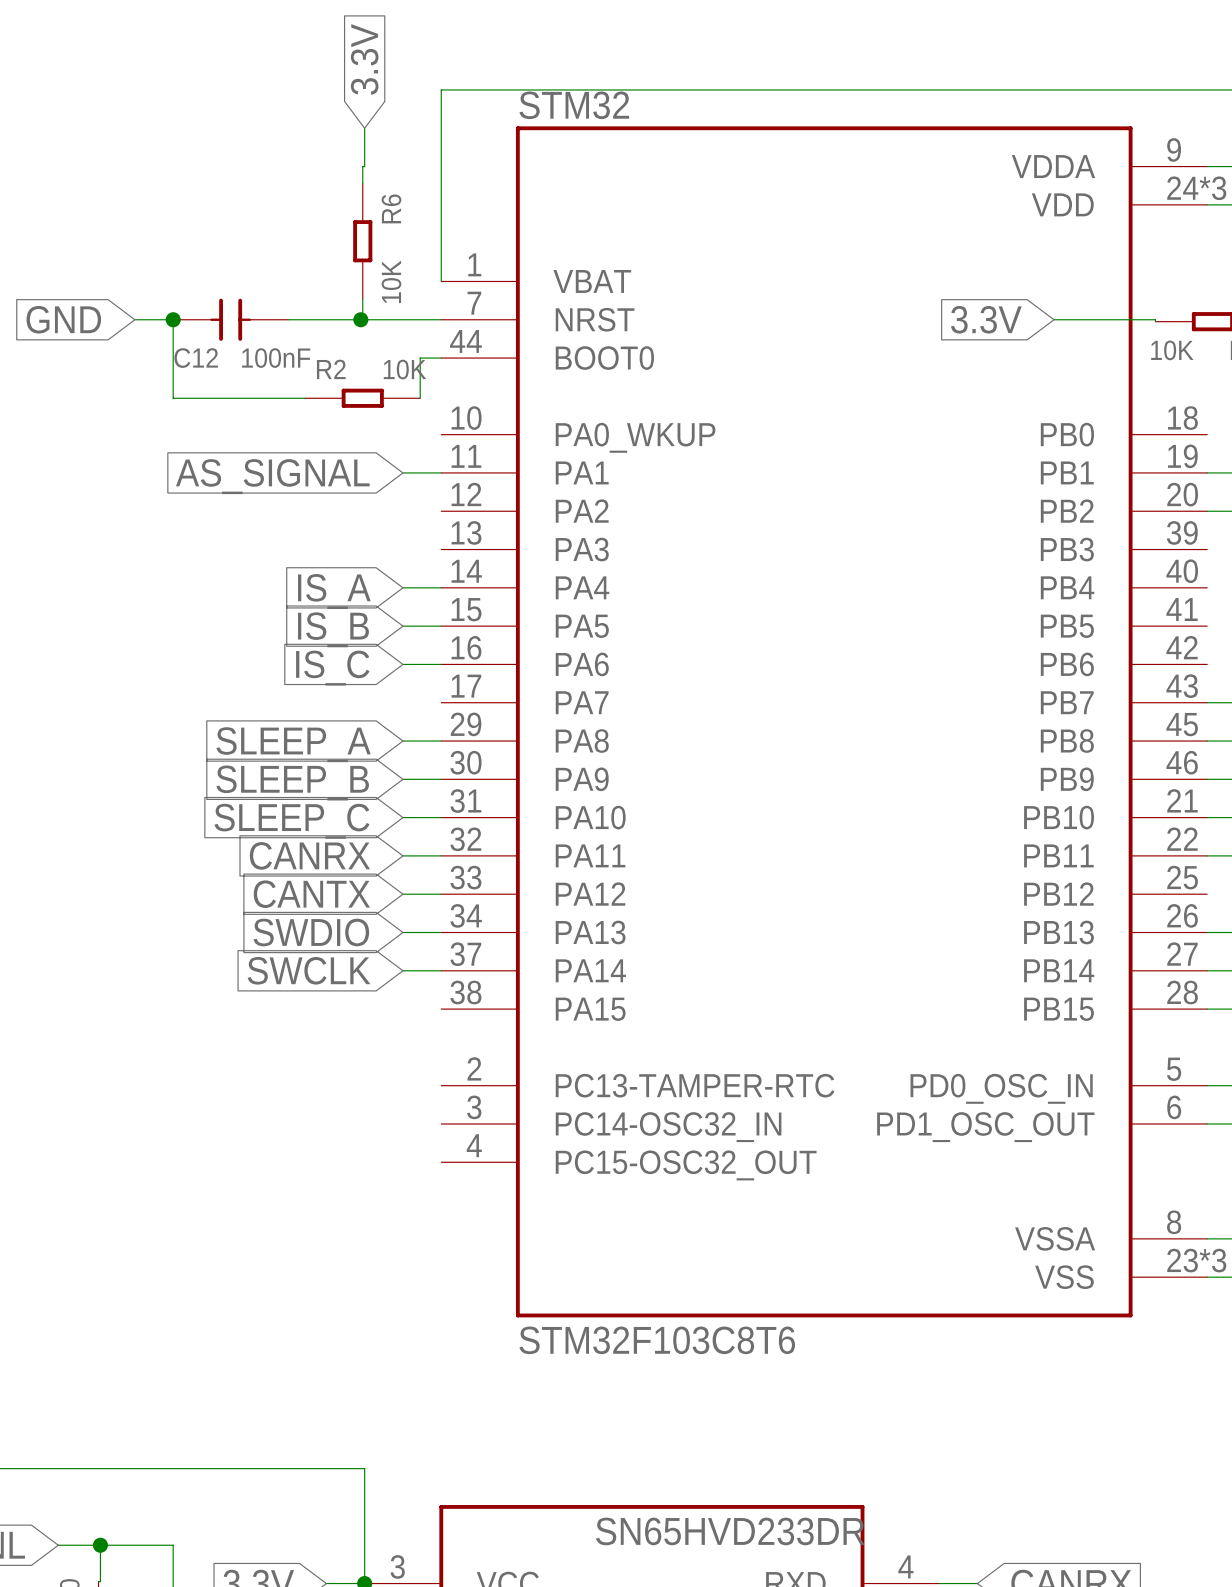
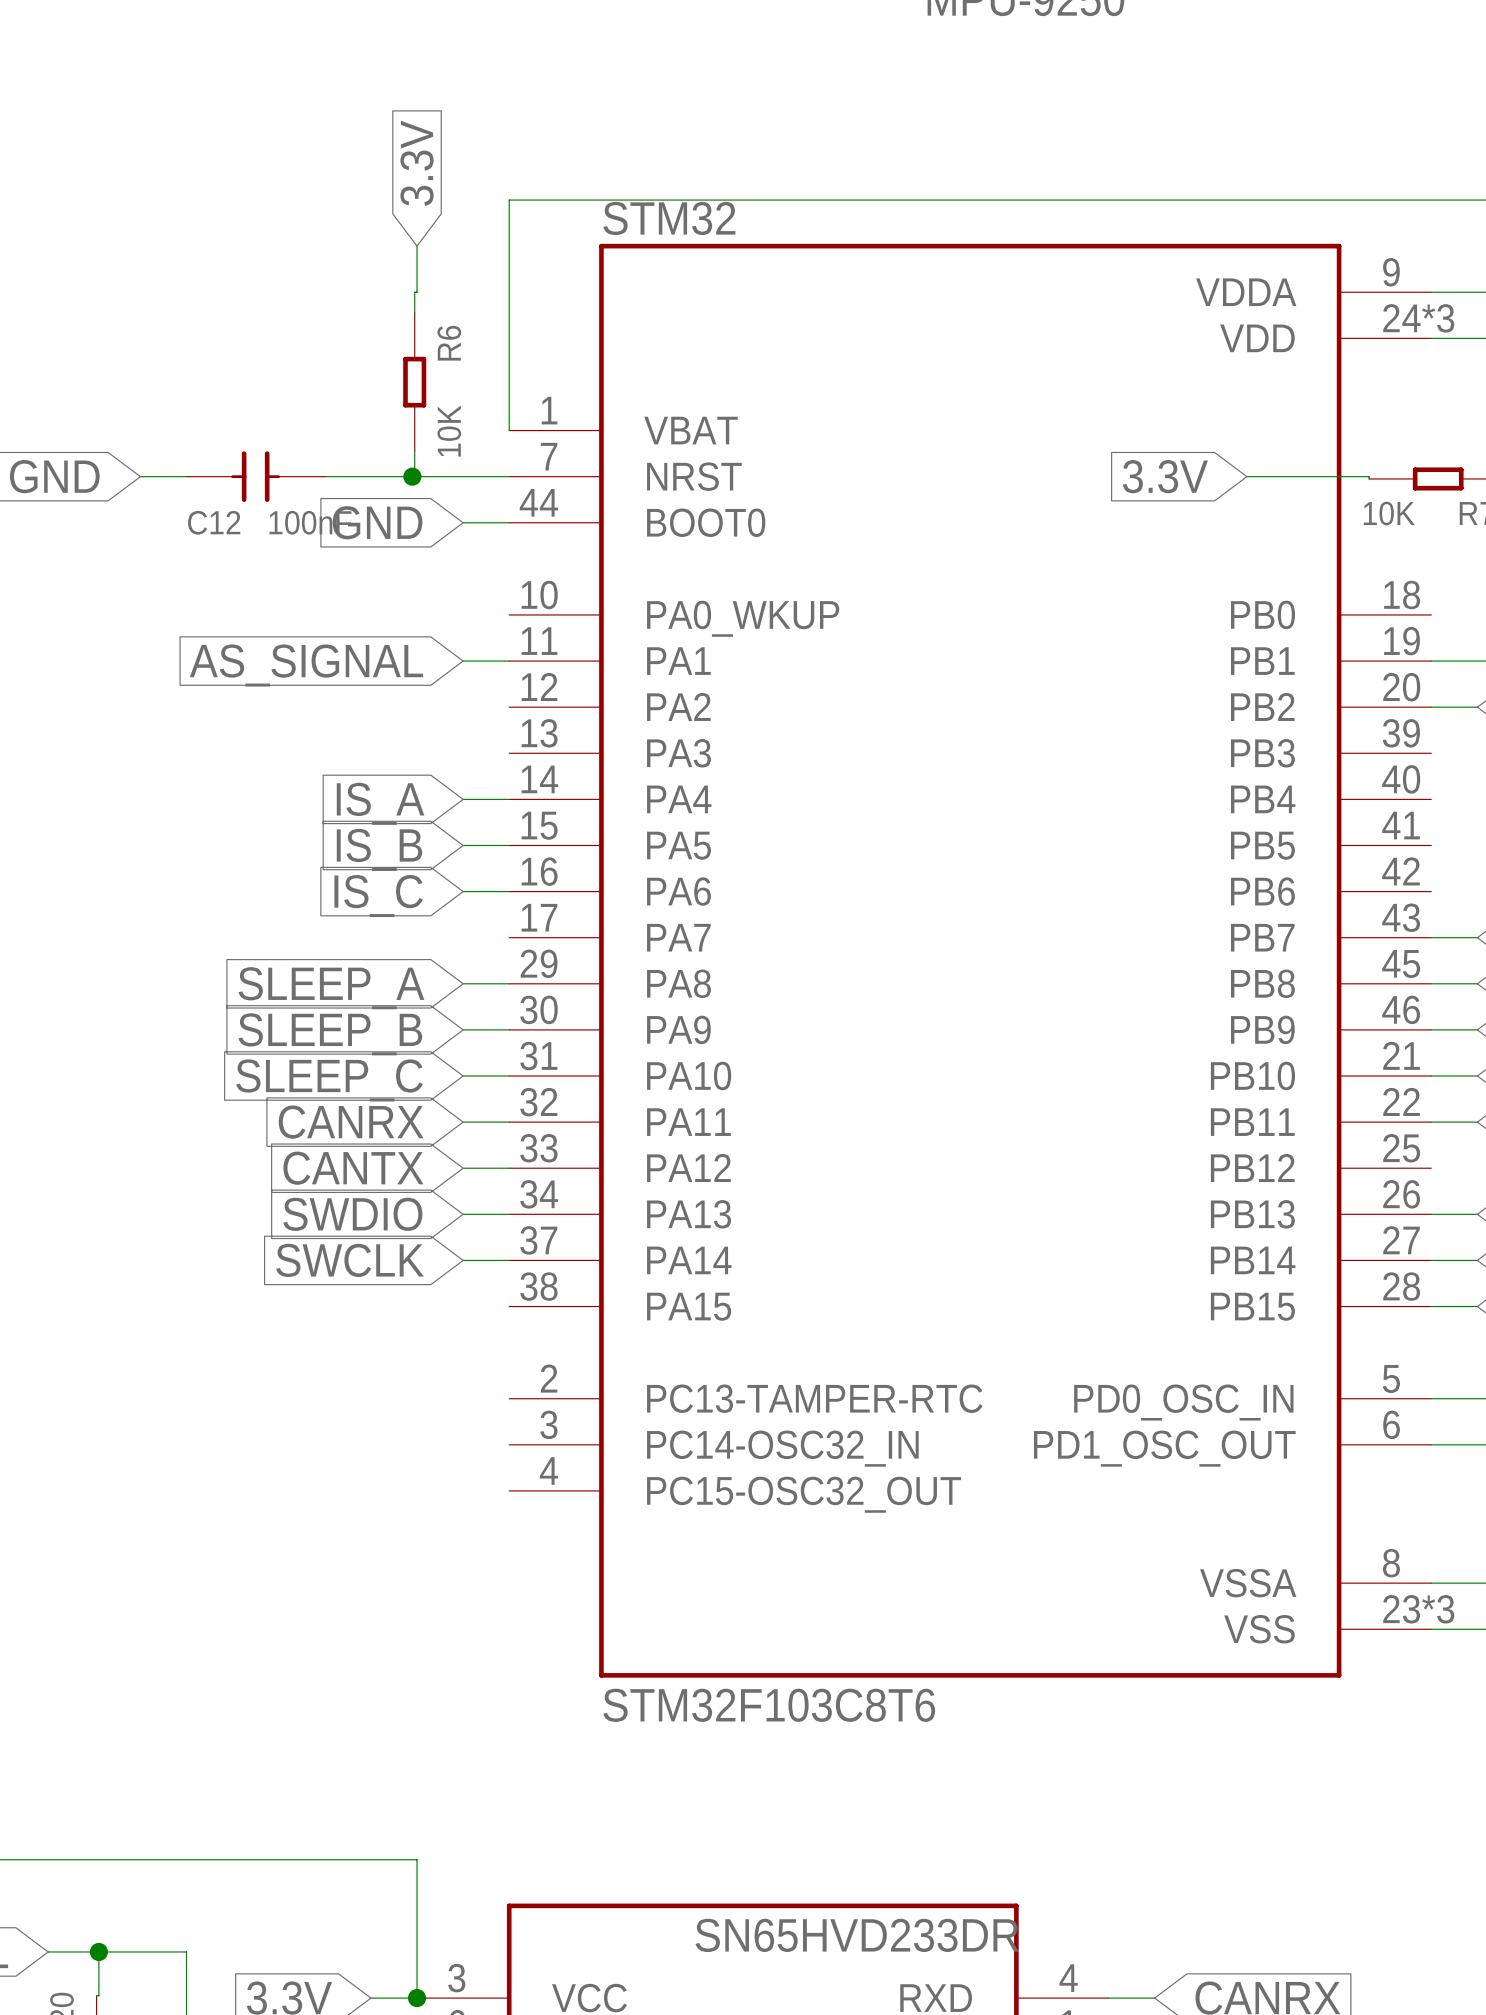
wire: (173, 319) (173, 398) (305, 398) -> none
junction: (173, 319) -> none
global label: none -> GND (377, 522)
wire: (420, 358) (420, 398) -> (483, 522) (463, 522)
R2: 10K (362, 398) -> none

